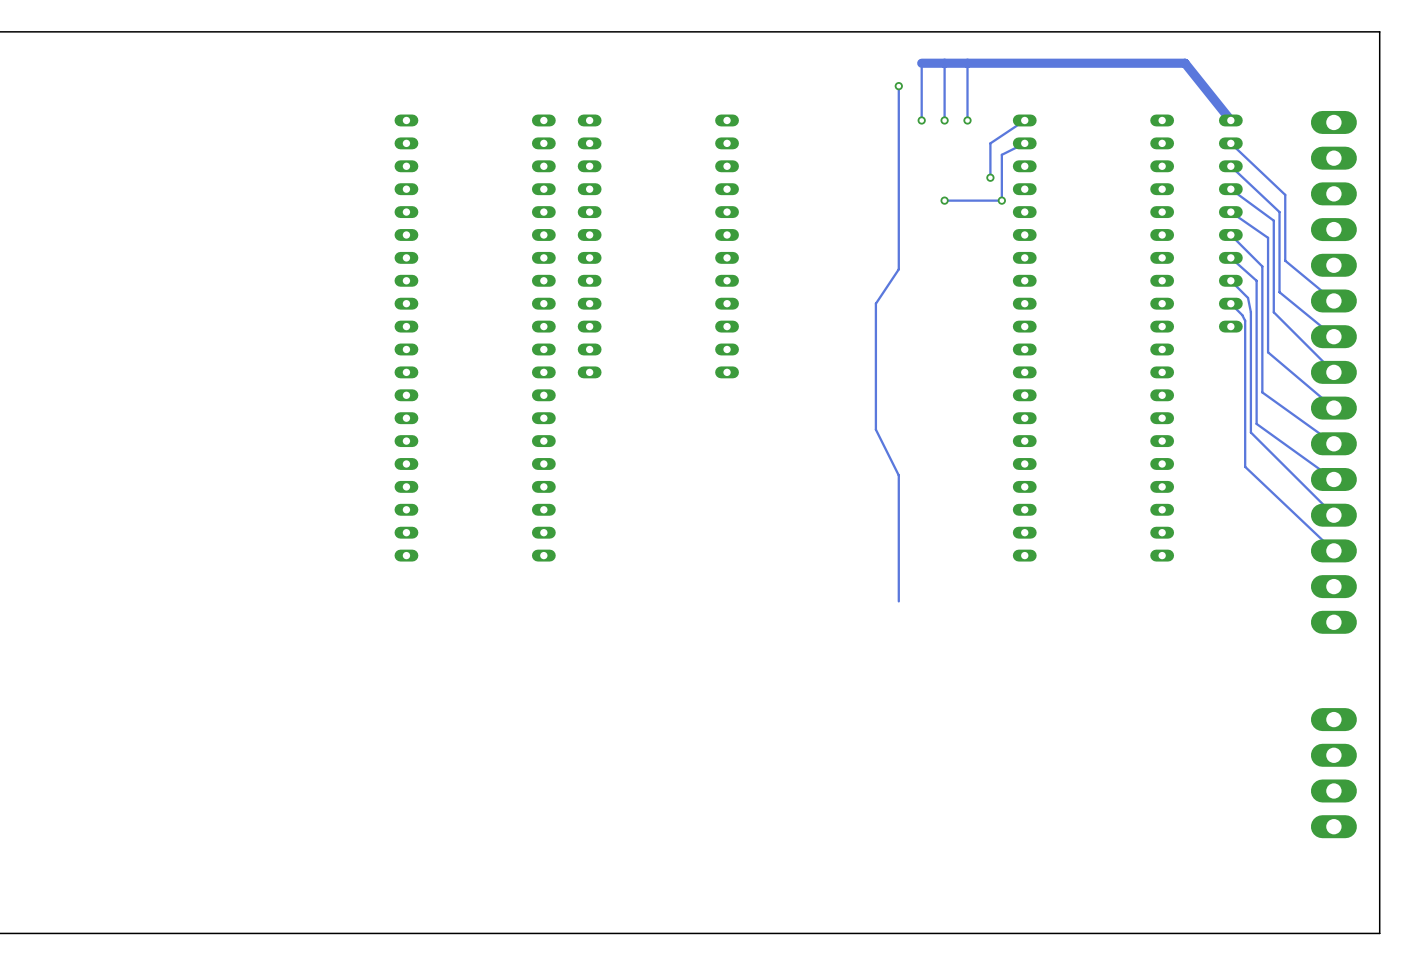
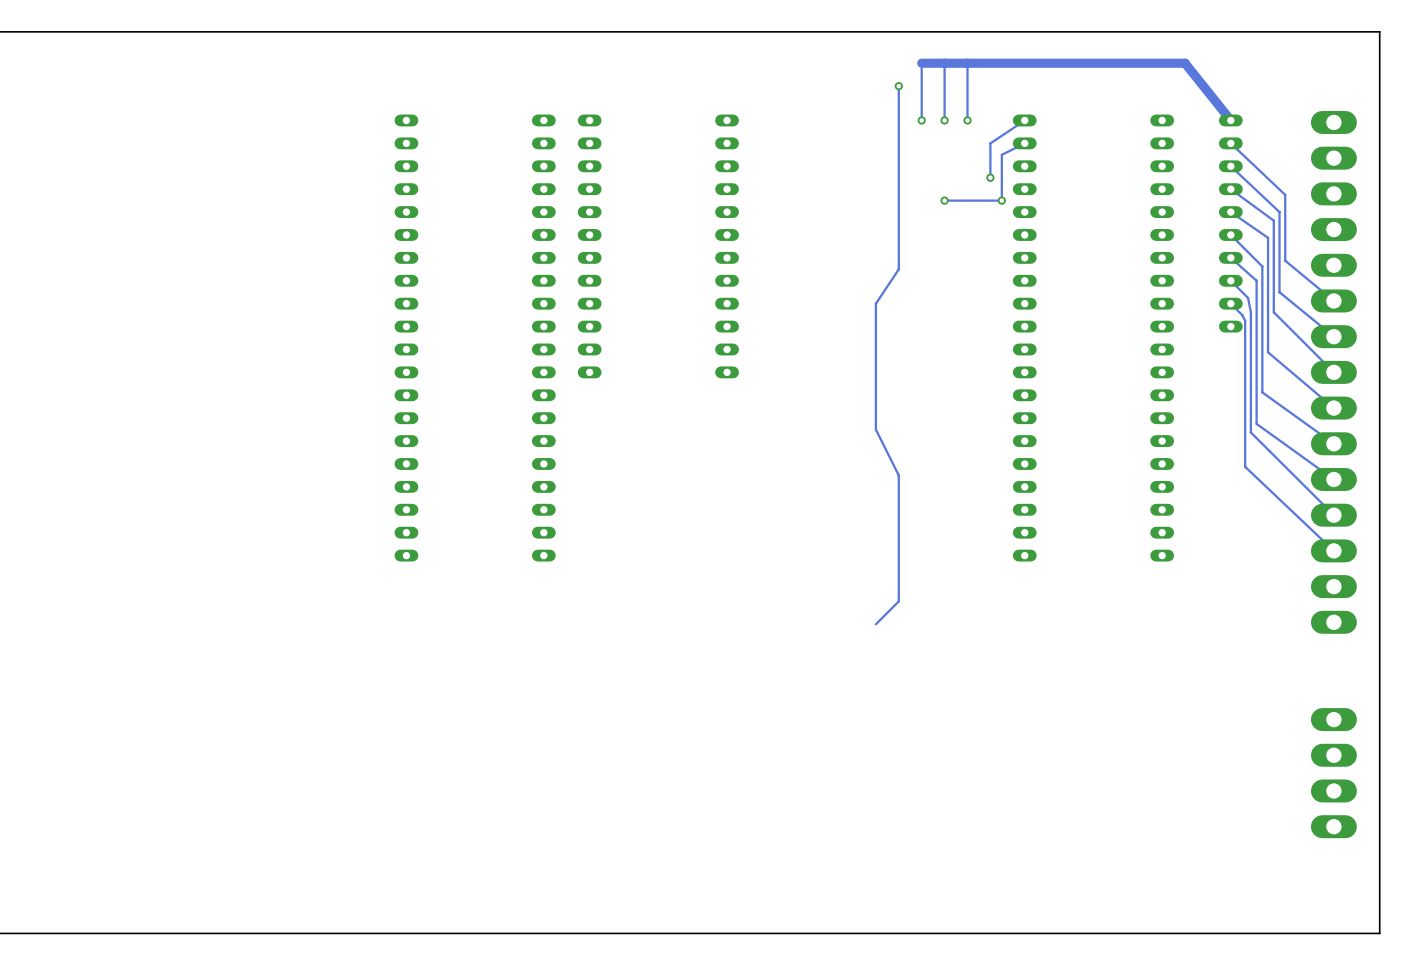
track: none -> (898, 601) (875, 624)

